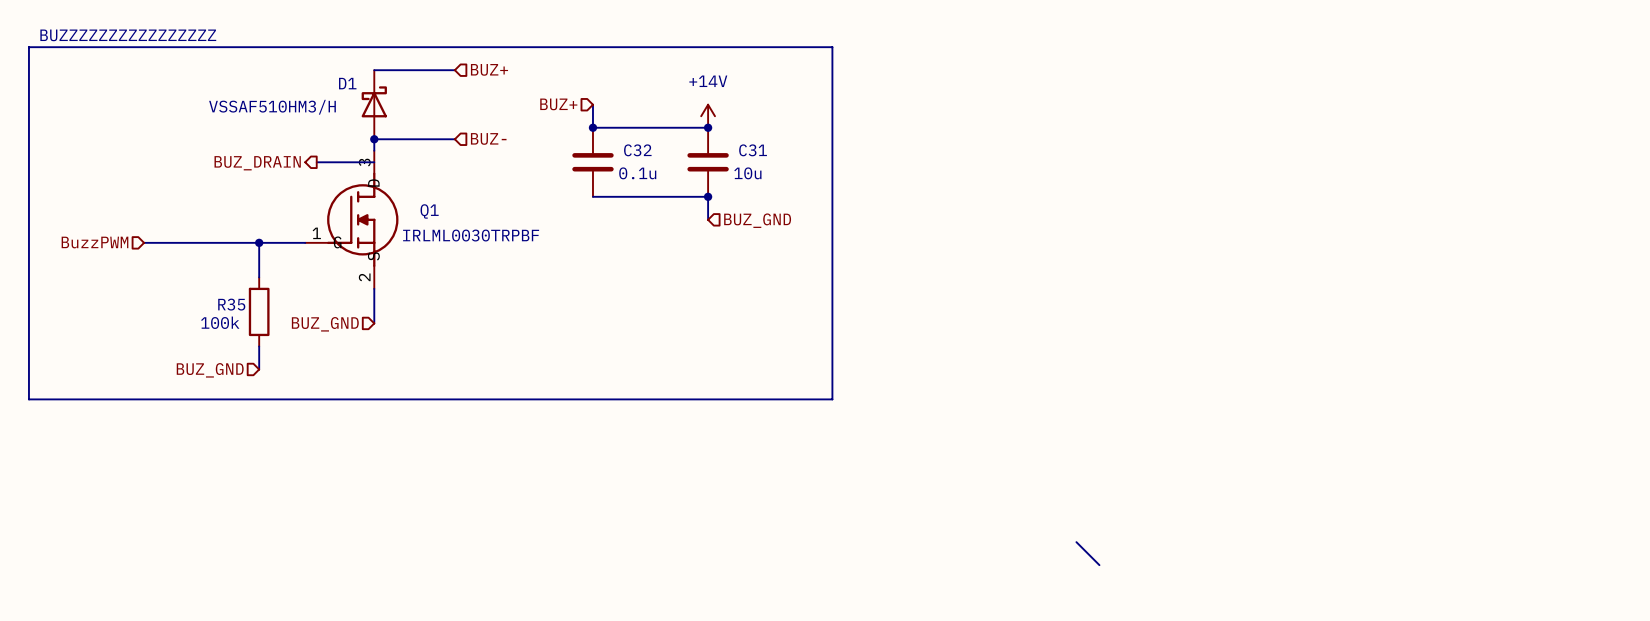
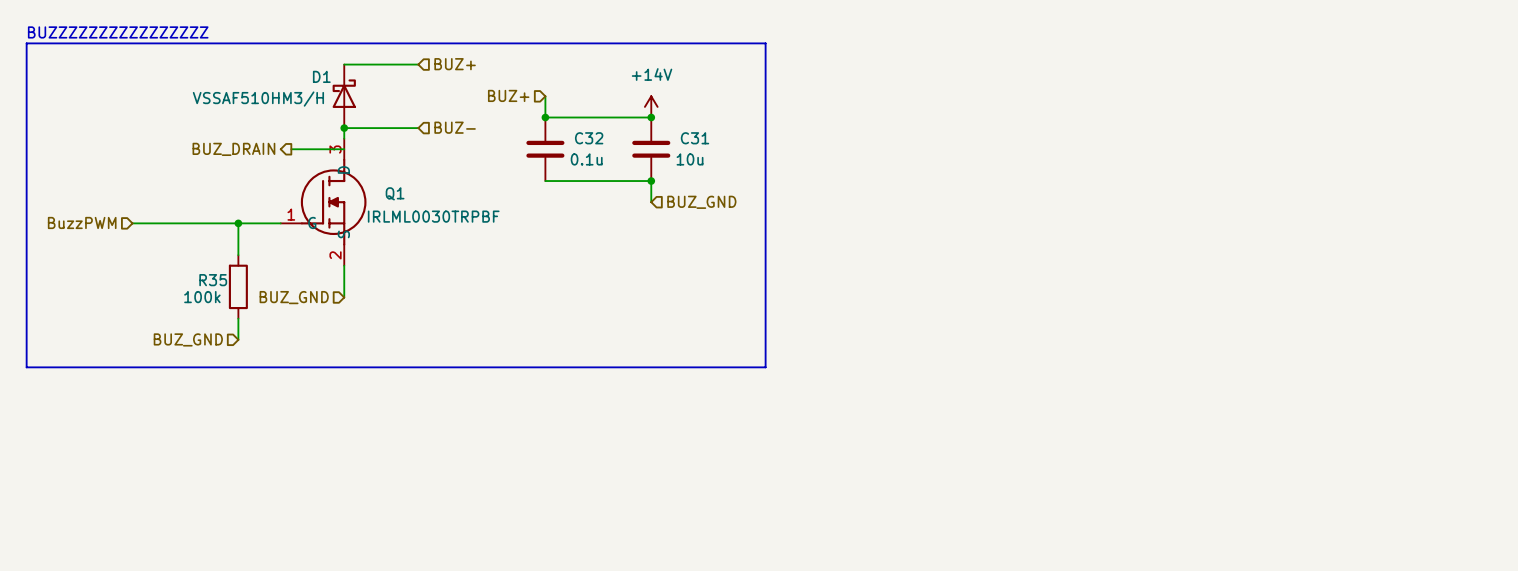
wire: (1076, 542) (1099, 565) -> none

